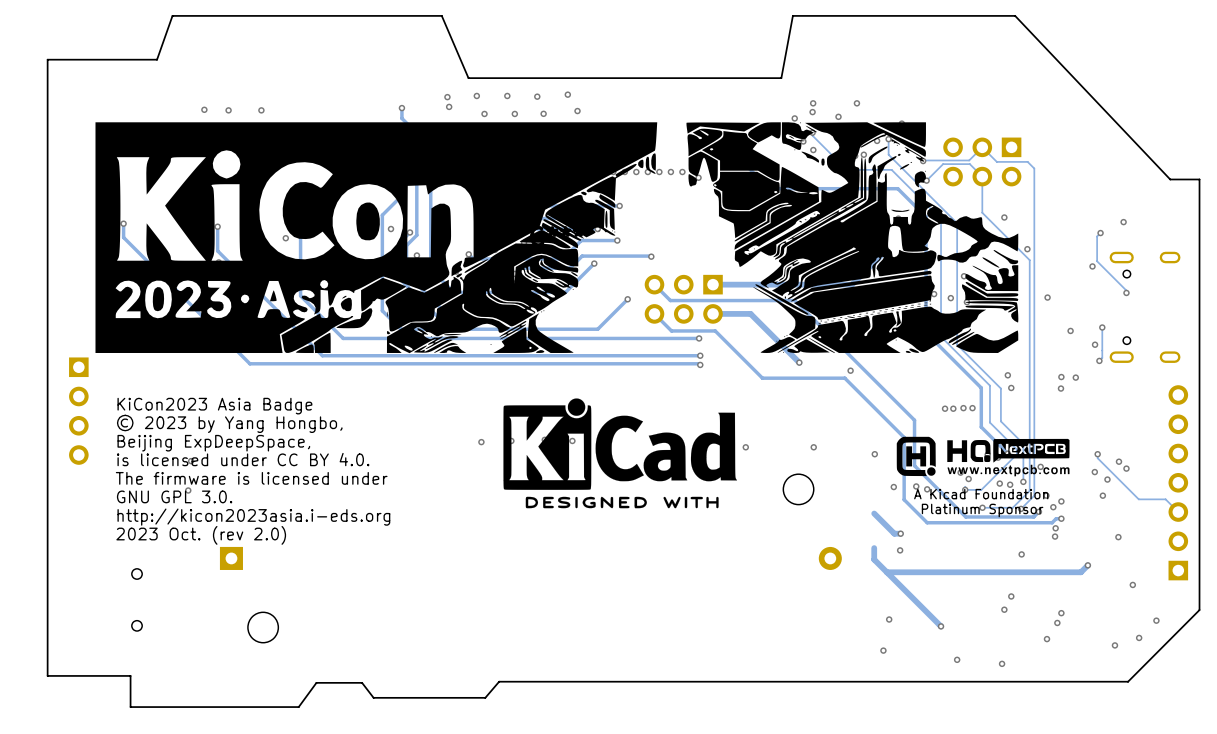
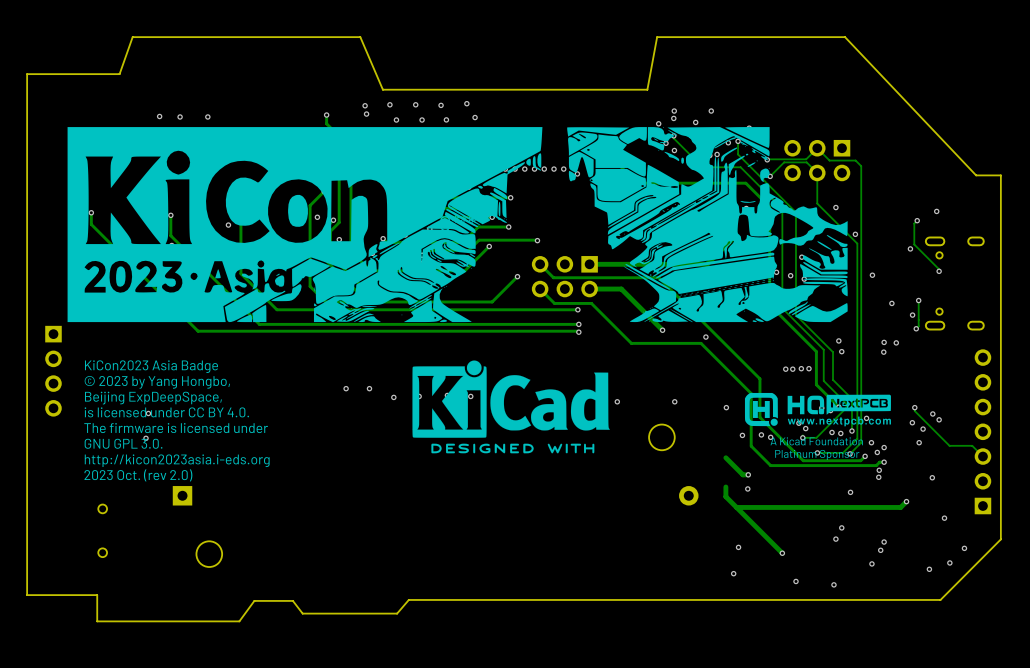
via: none -> (346, 388)
via: none -> (369, 388)

